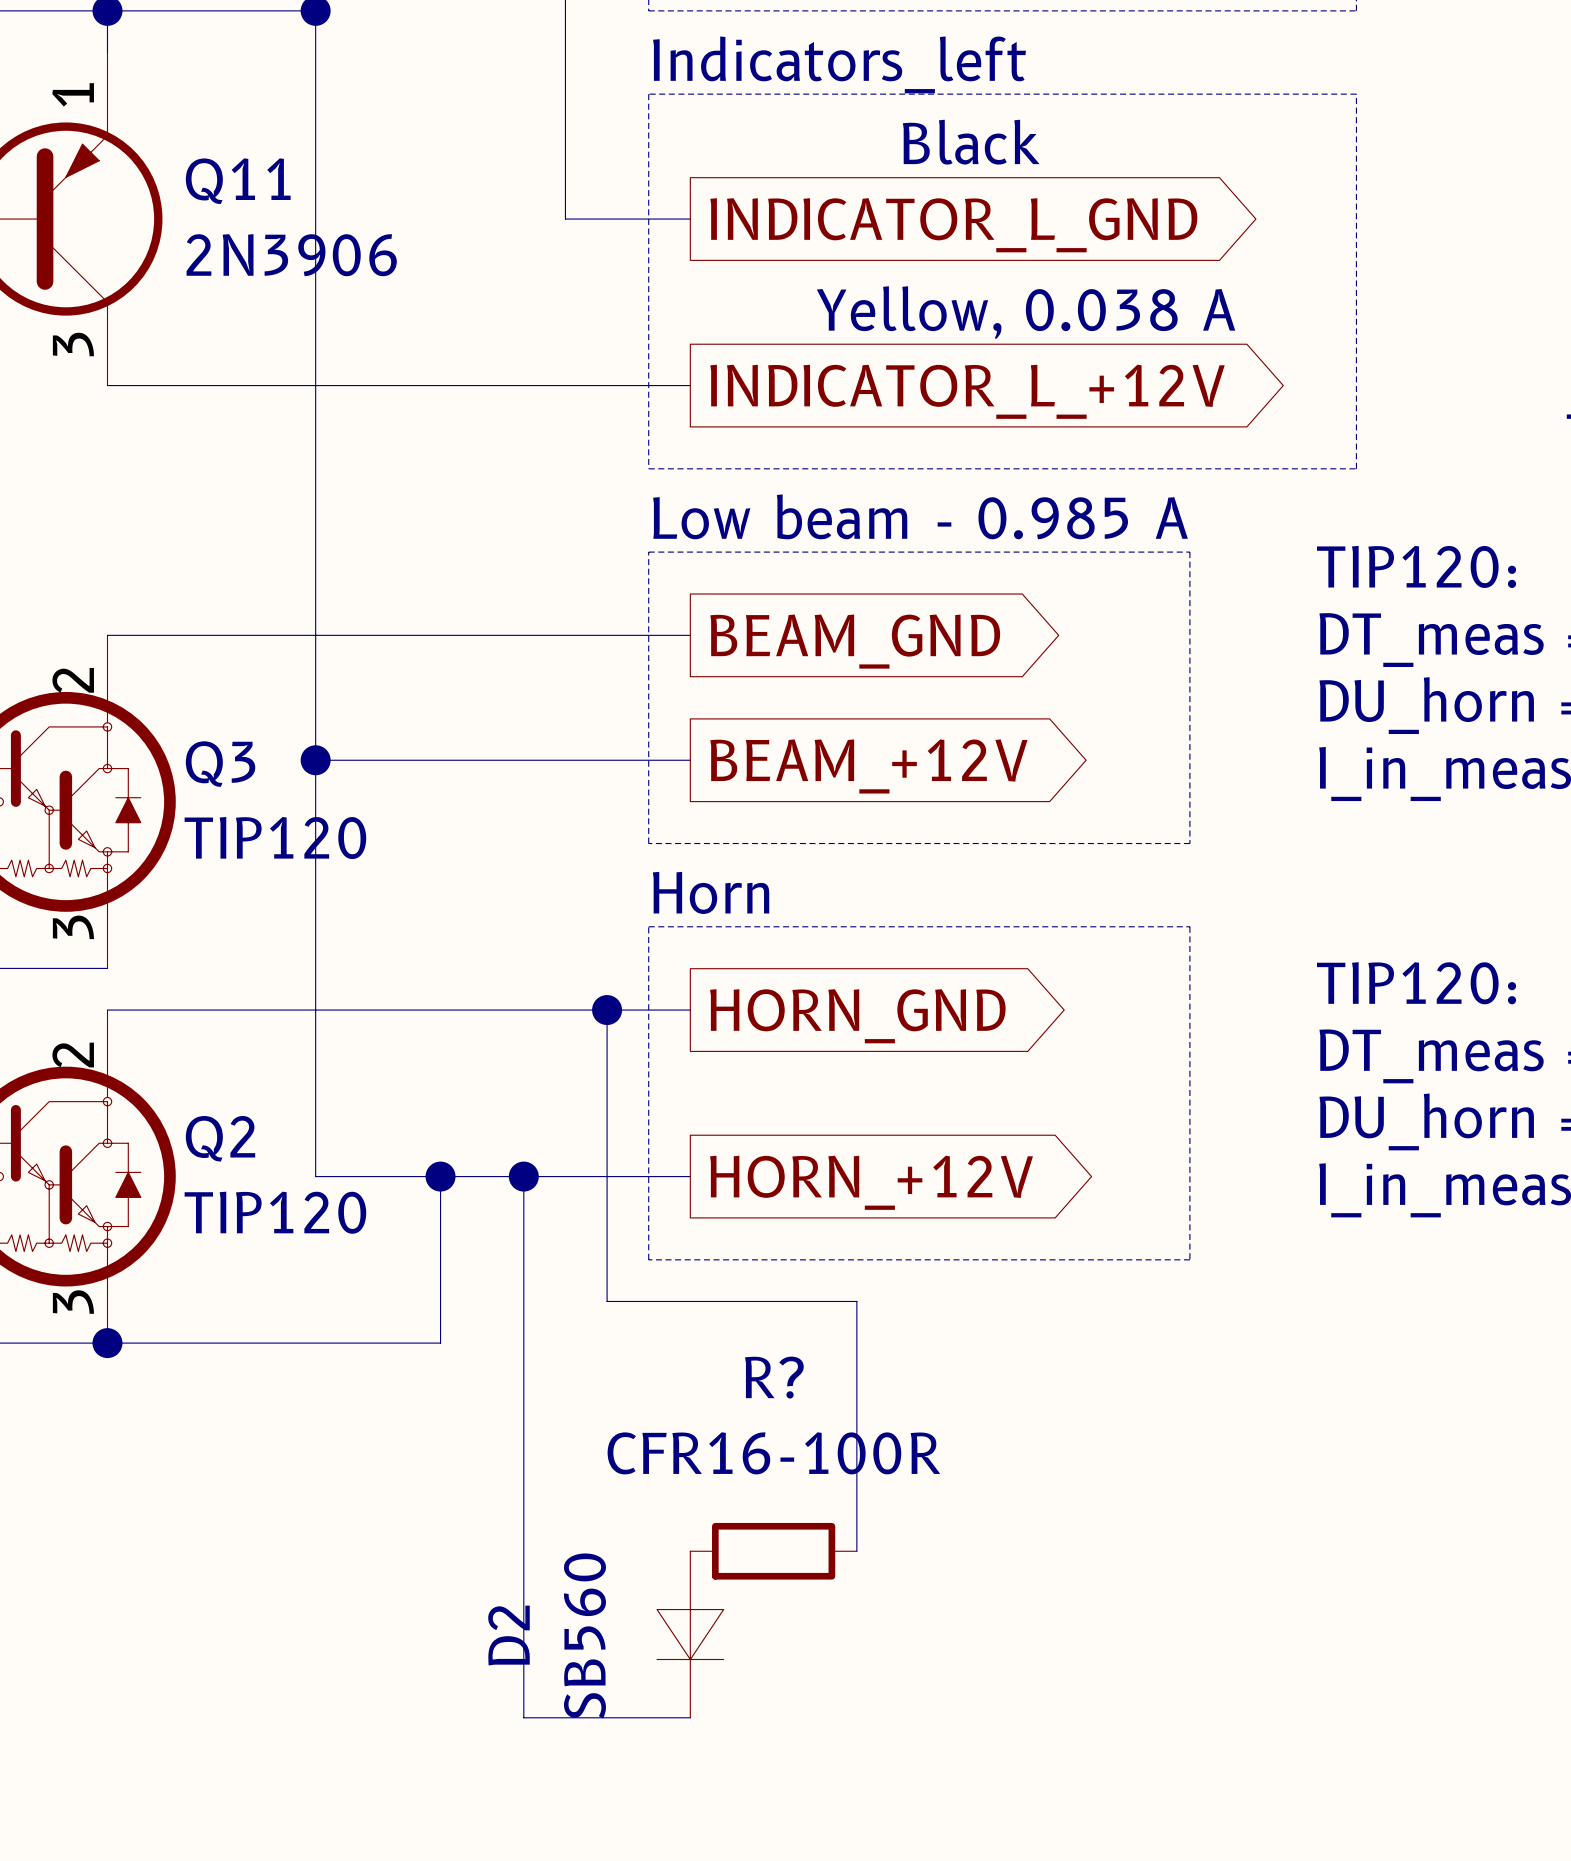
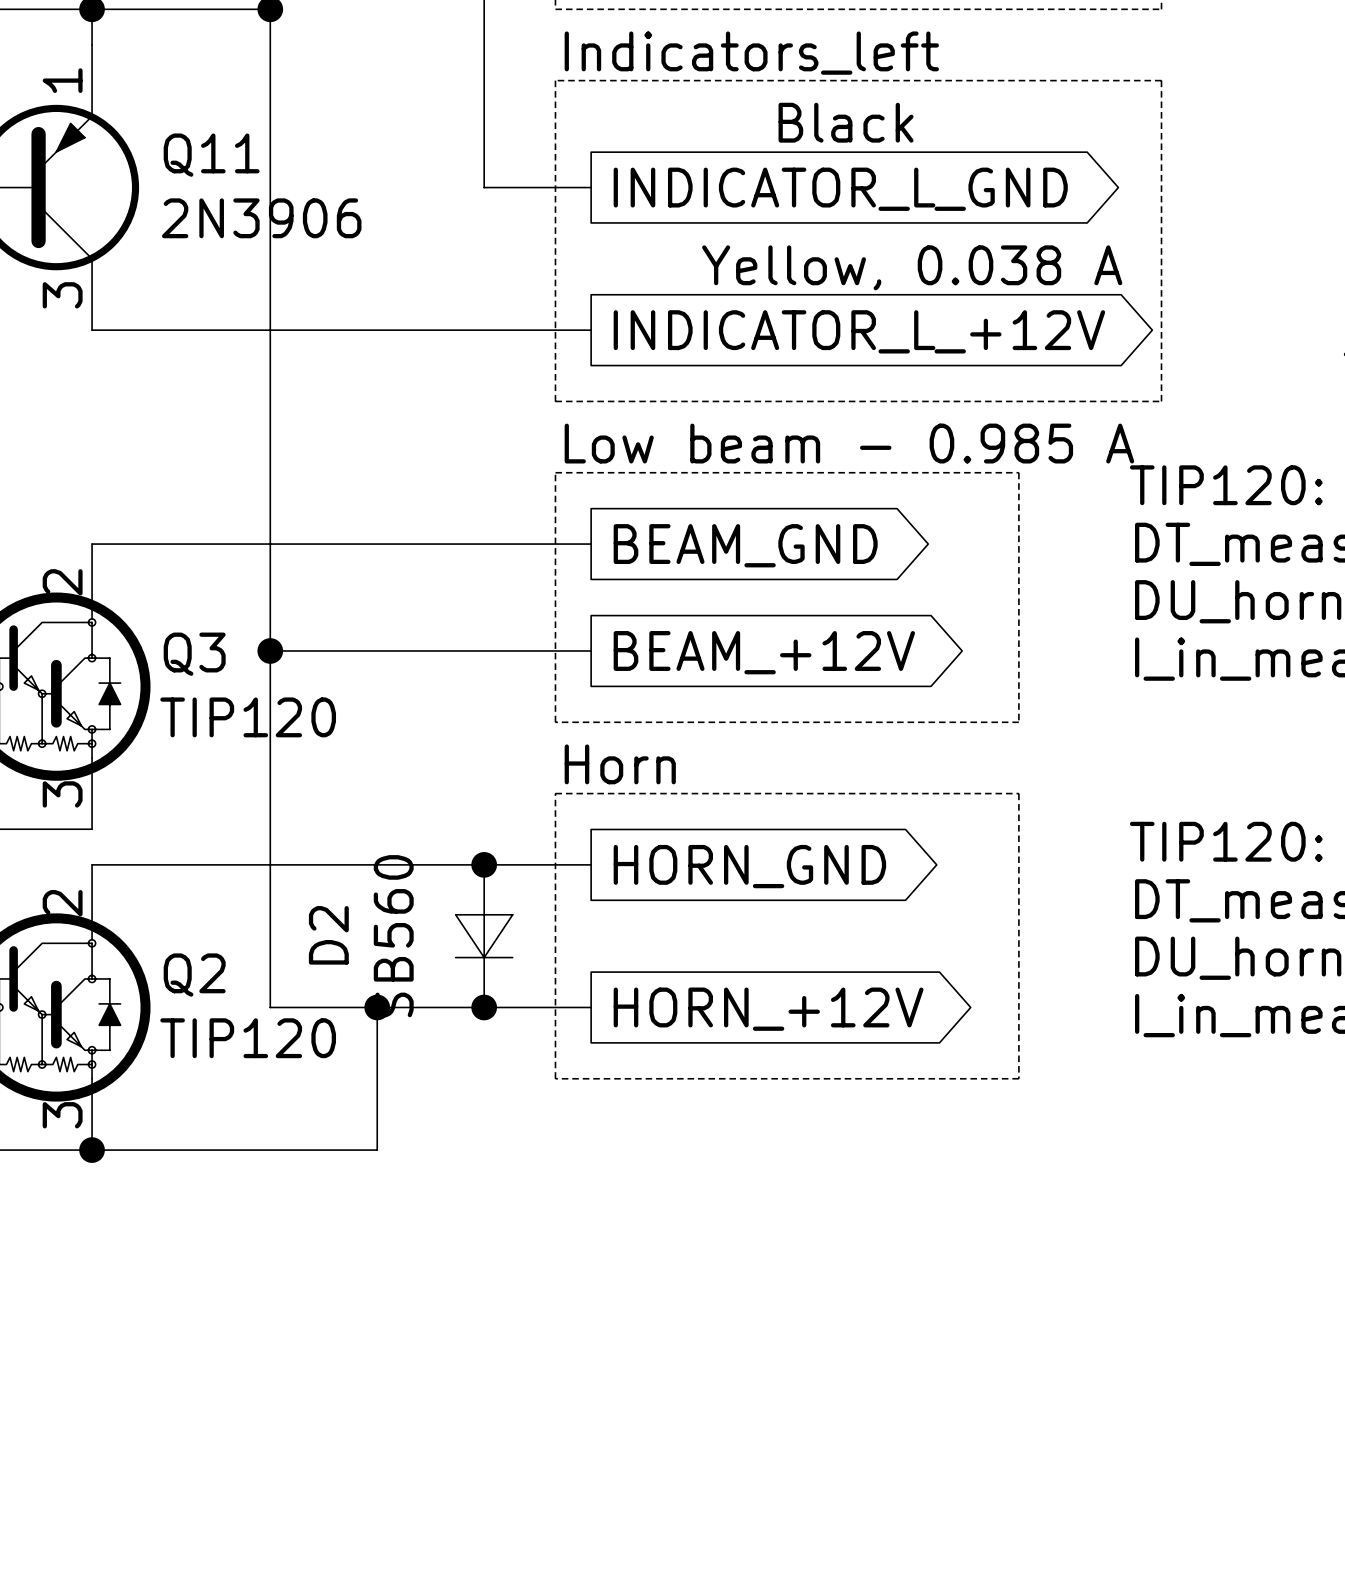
wire: (607, 1010) (607, 1301) (856, 1301) (856, 1551) -> none
junction position: (607, 1010) -> (484, 864)
wire: (523, 1176) (523, 1717) (690, 1717) -> none
junction position: (523, 1176) -> (484, 1007)
R?: CFR16-100R (773, 1551) -> none
D2 position: (690, 1634) -> (484, 936)

